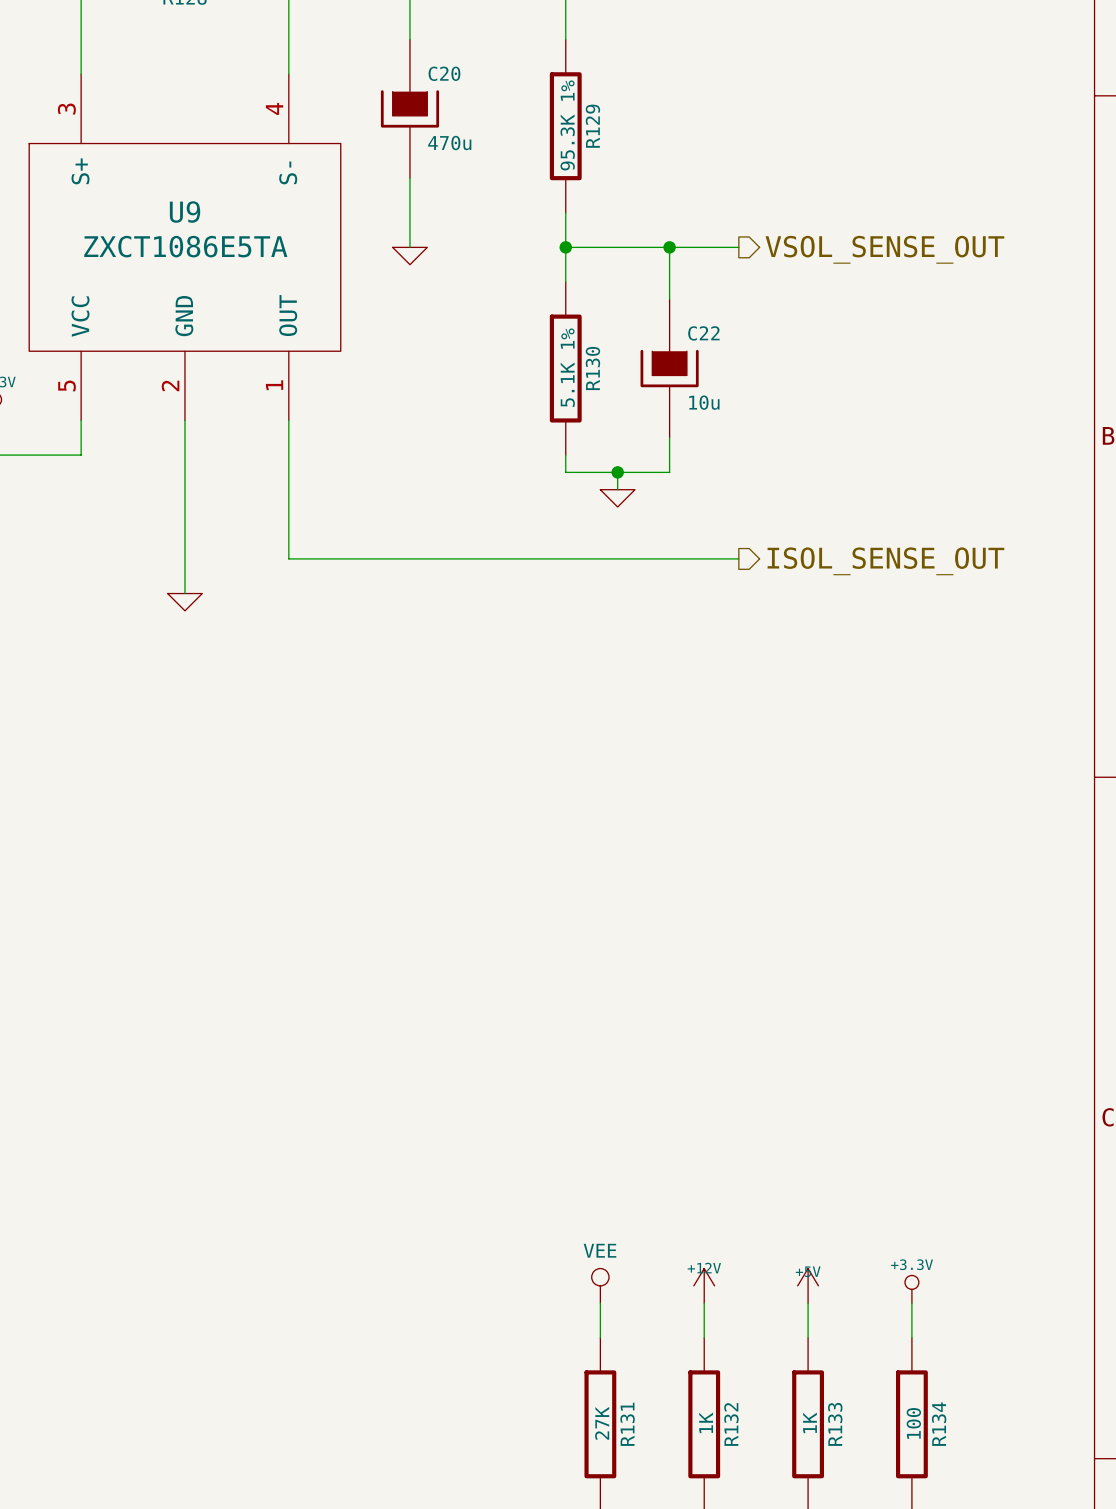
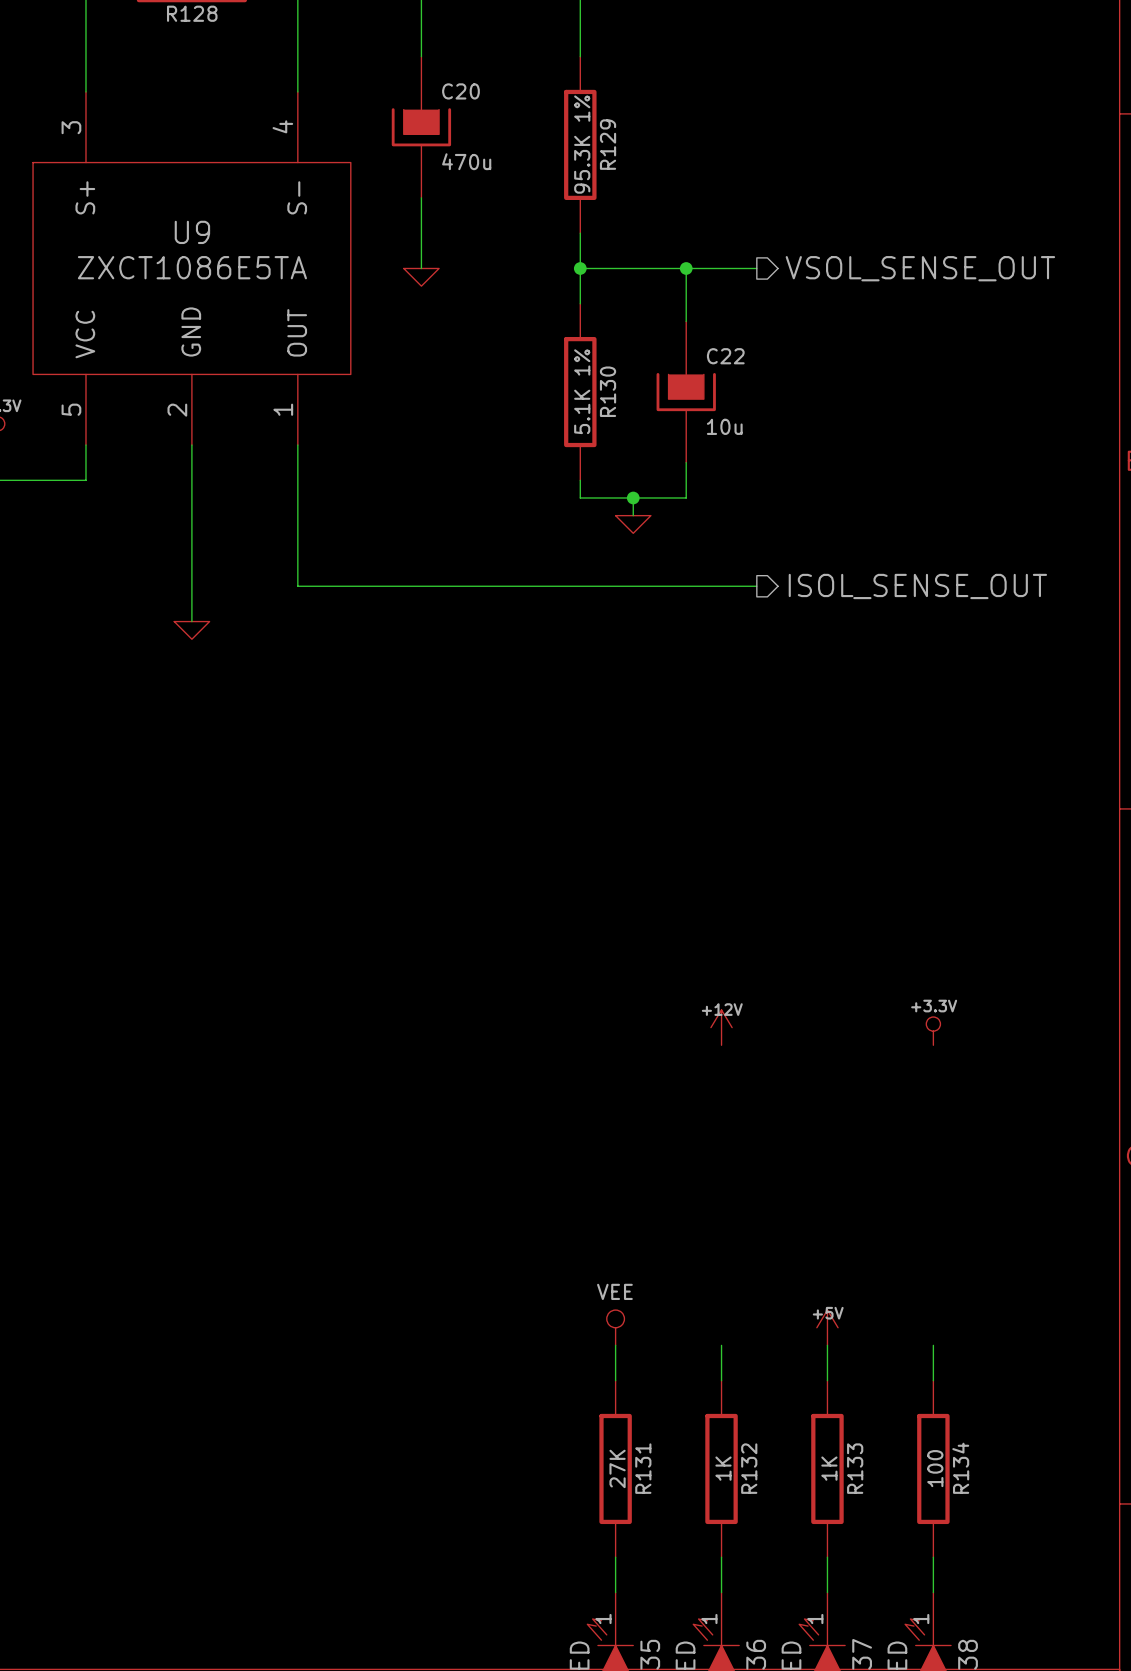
power symbol position: +12V (704, 1285) -> +12V (721, 1027)
power symbol position: +3.3V (911, 1289) -> +3.3V (933, 1031)

